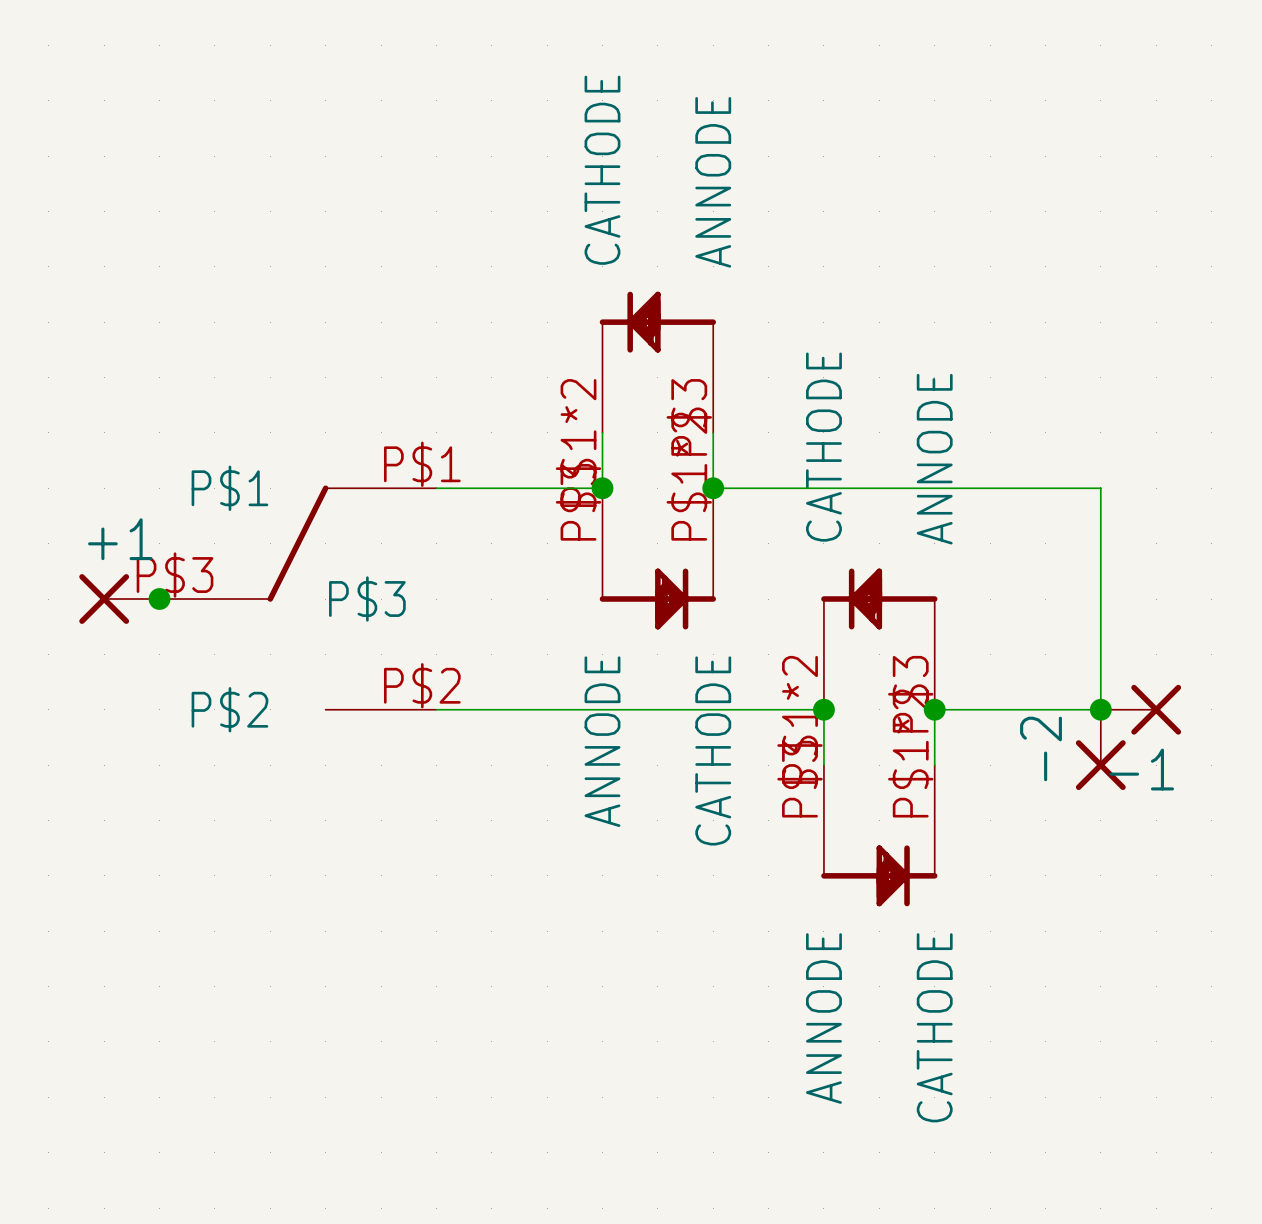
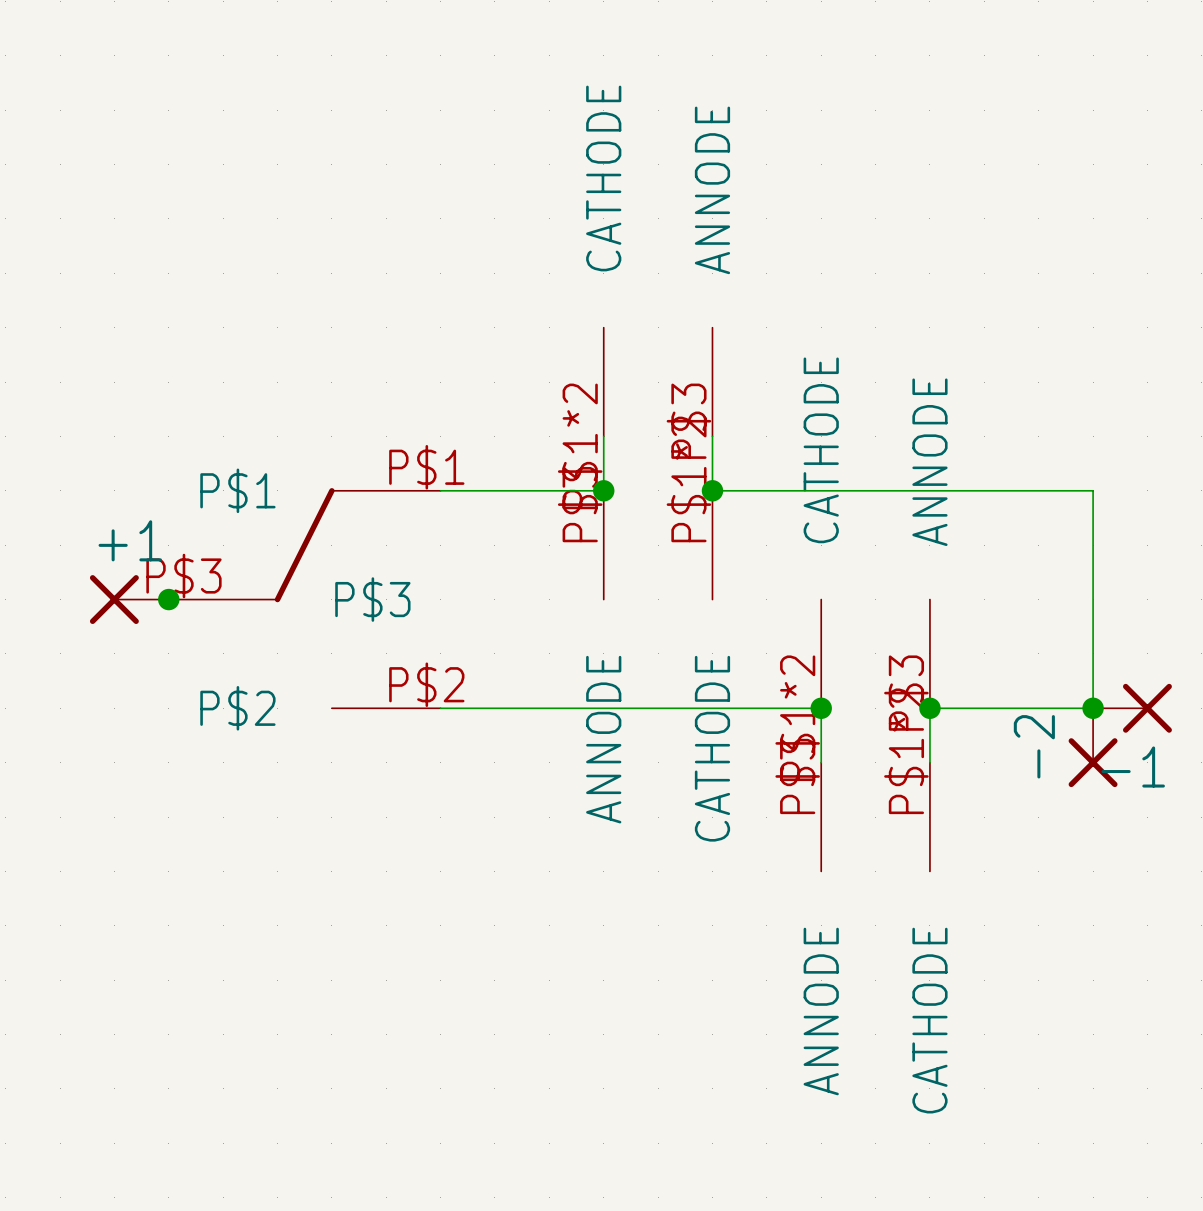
part symbol: [599, 291, 717, 433] -> [603, 327, 713, 437]
part symbol: [599, 488, 717, 630] -> [603, 490, 713, 600]
part symbol: [821, 568, 938, 710] -> [821, 599, 930, 709]
part symbol: [821, 765, 938, 907] -> [821, 762, 930, 872]

